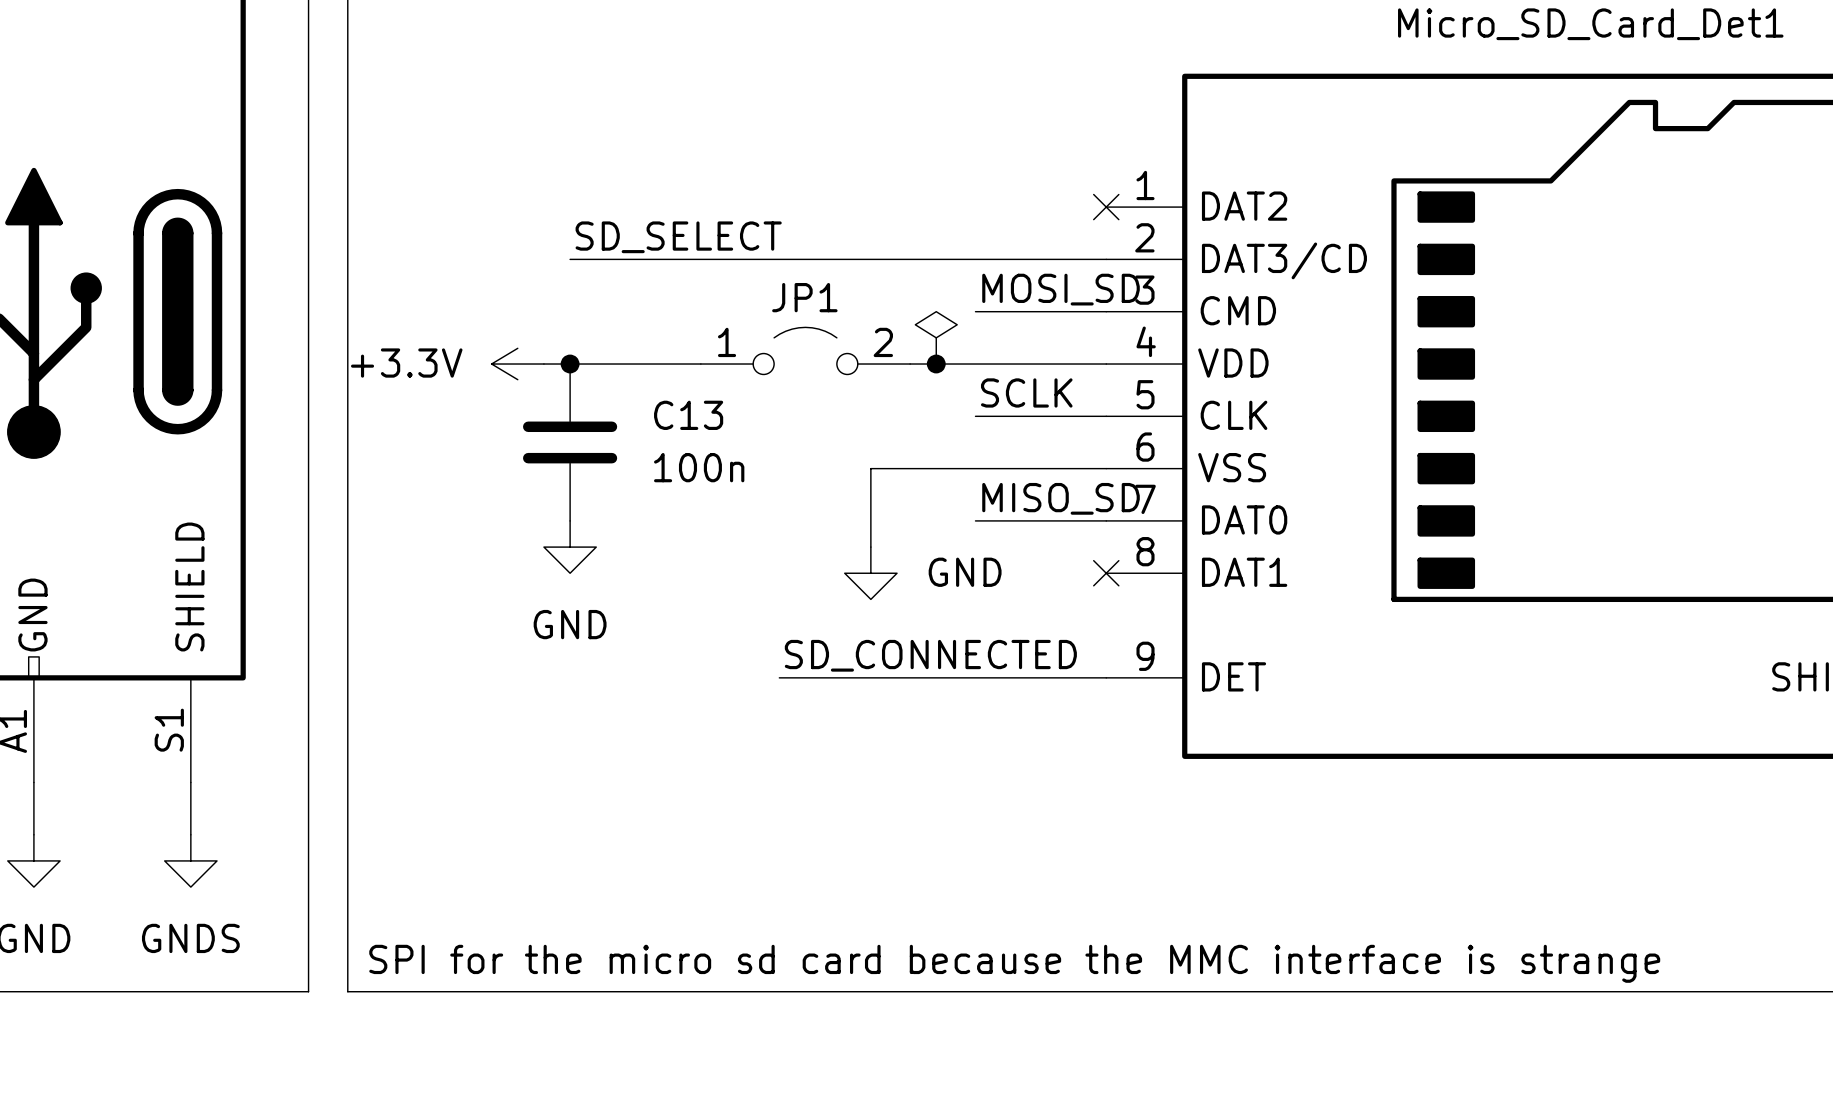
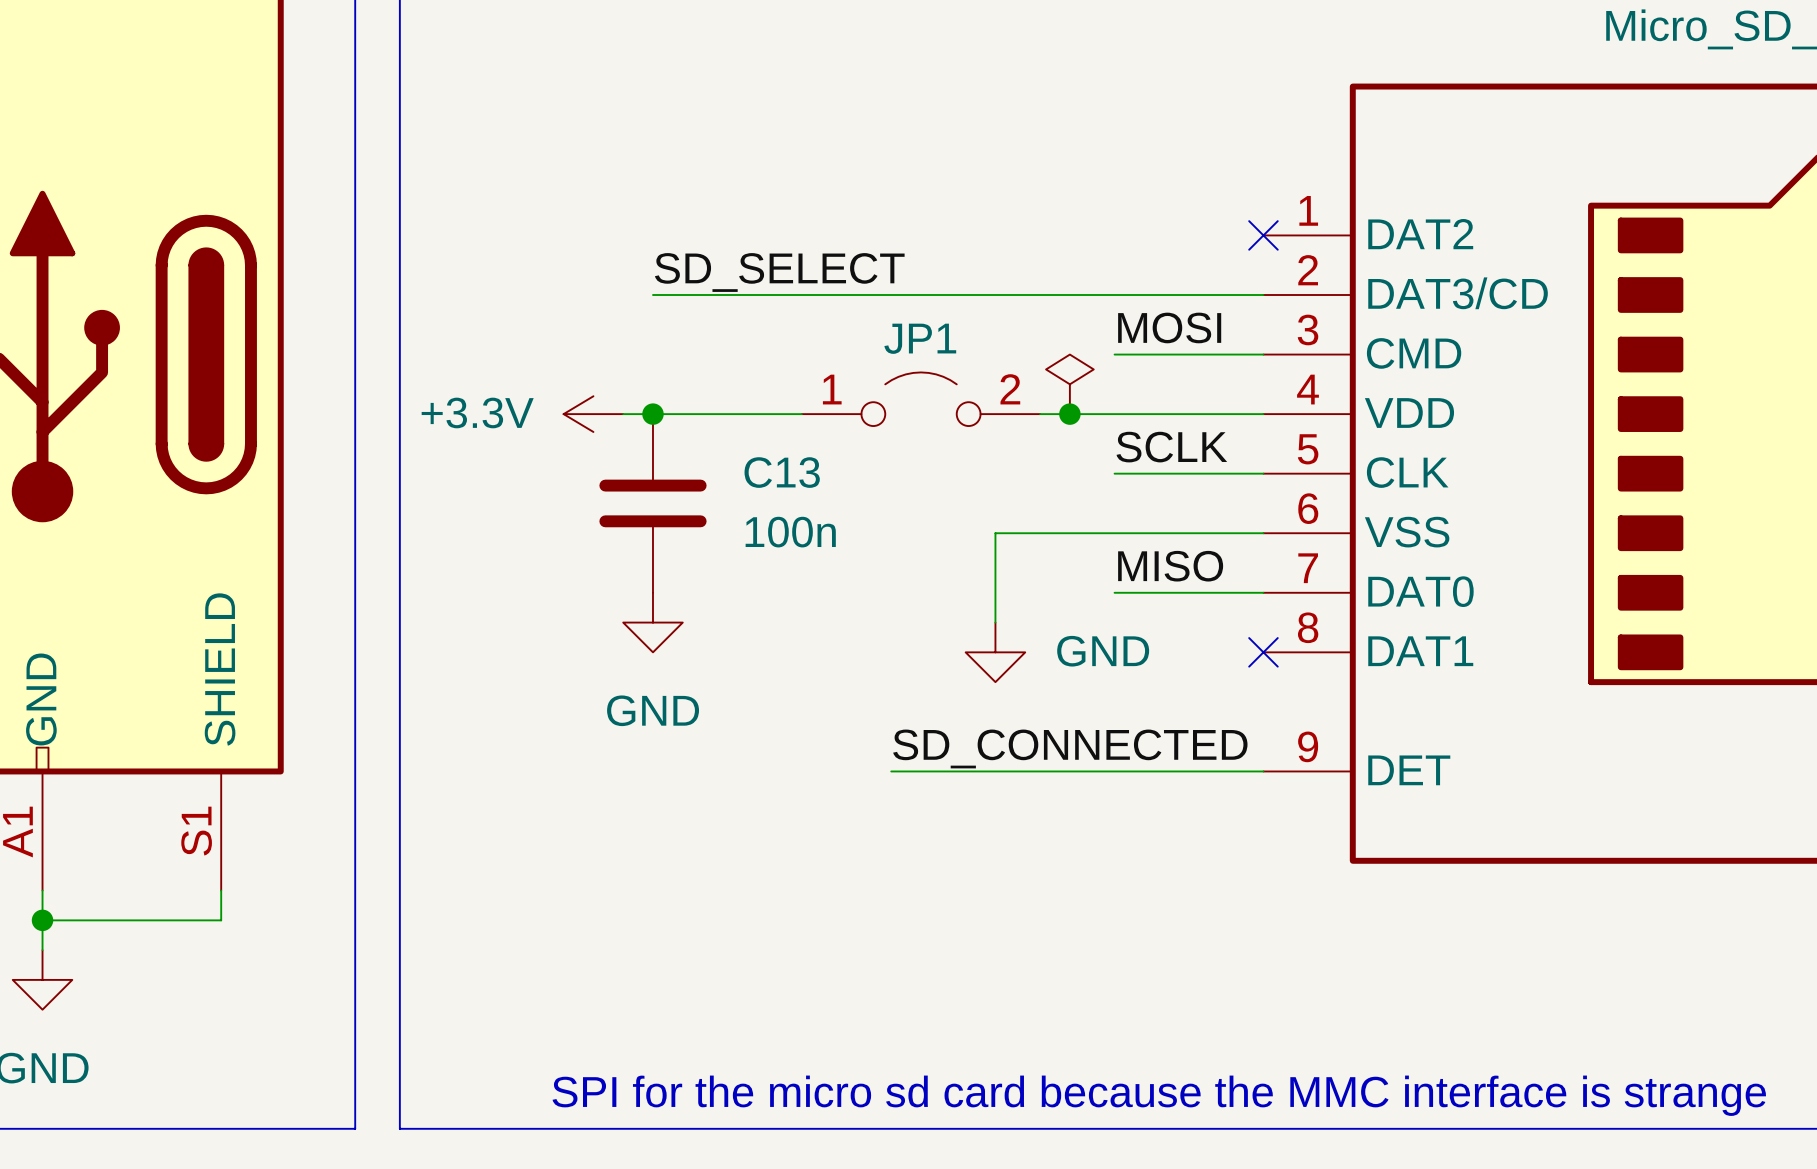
label: MOSI_SD (1061, 289) -> MOSI (1169, 327)
label: MISO_SD (1061, 498) -> MISO (1170, 566)
junction: none -> (42, 920)
wire: (190, 808) (190, 834) -> (221, 920) (42, 920)
power symbol: GNDS (190, 860) -> none

